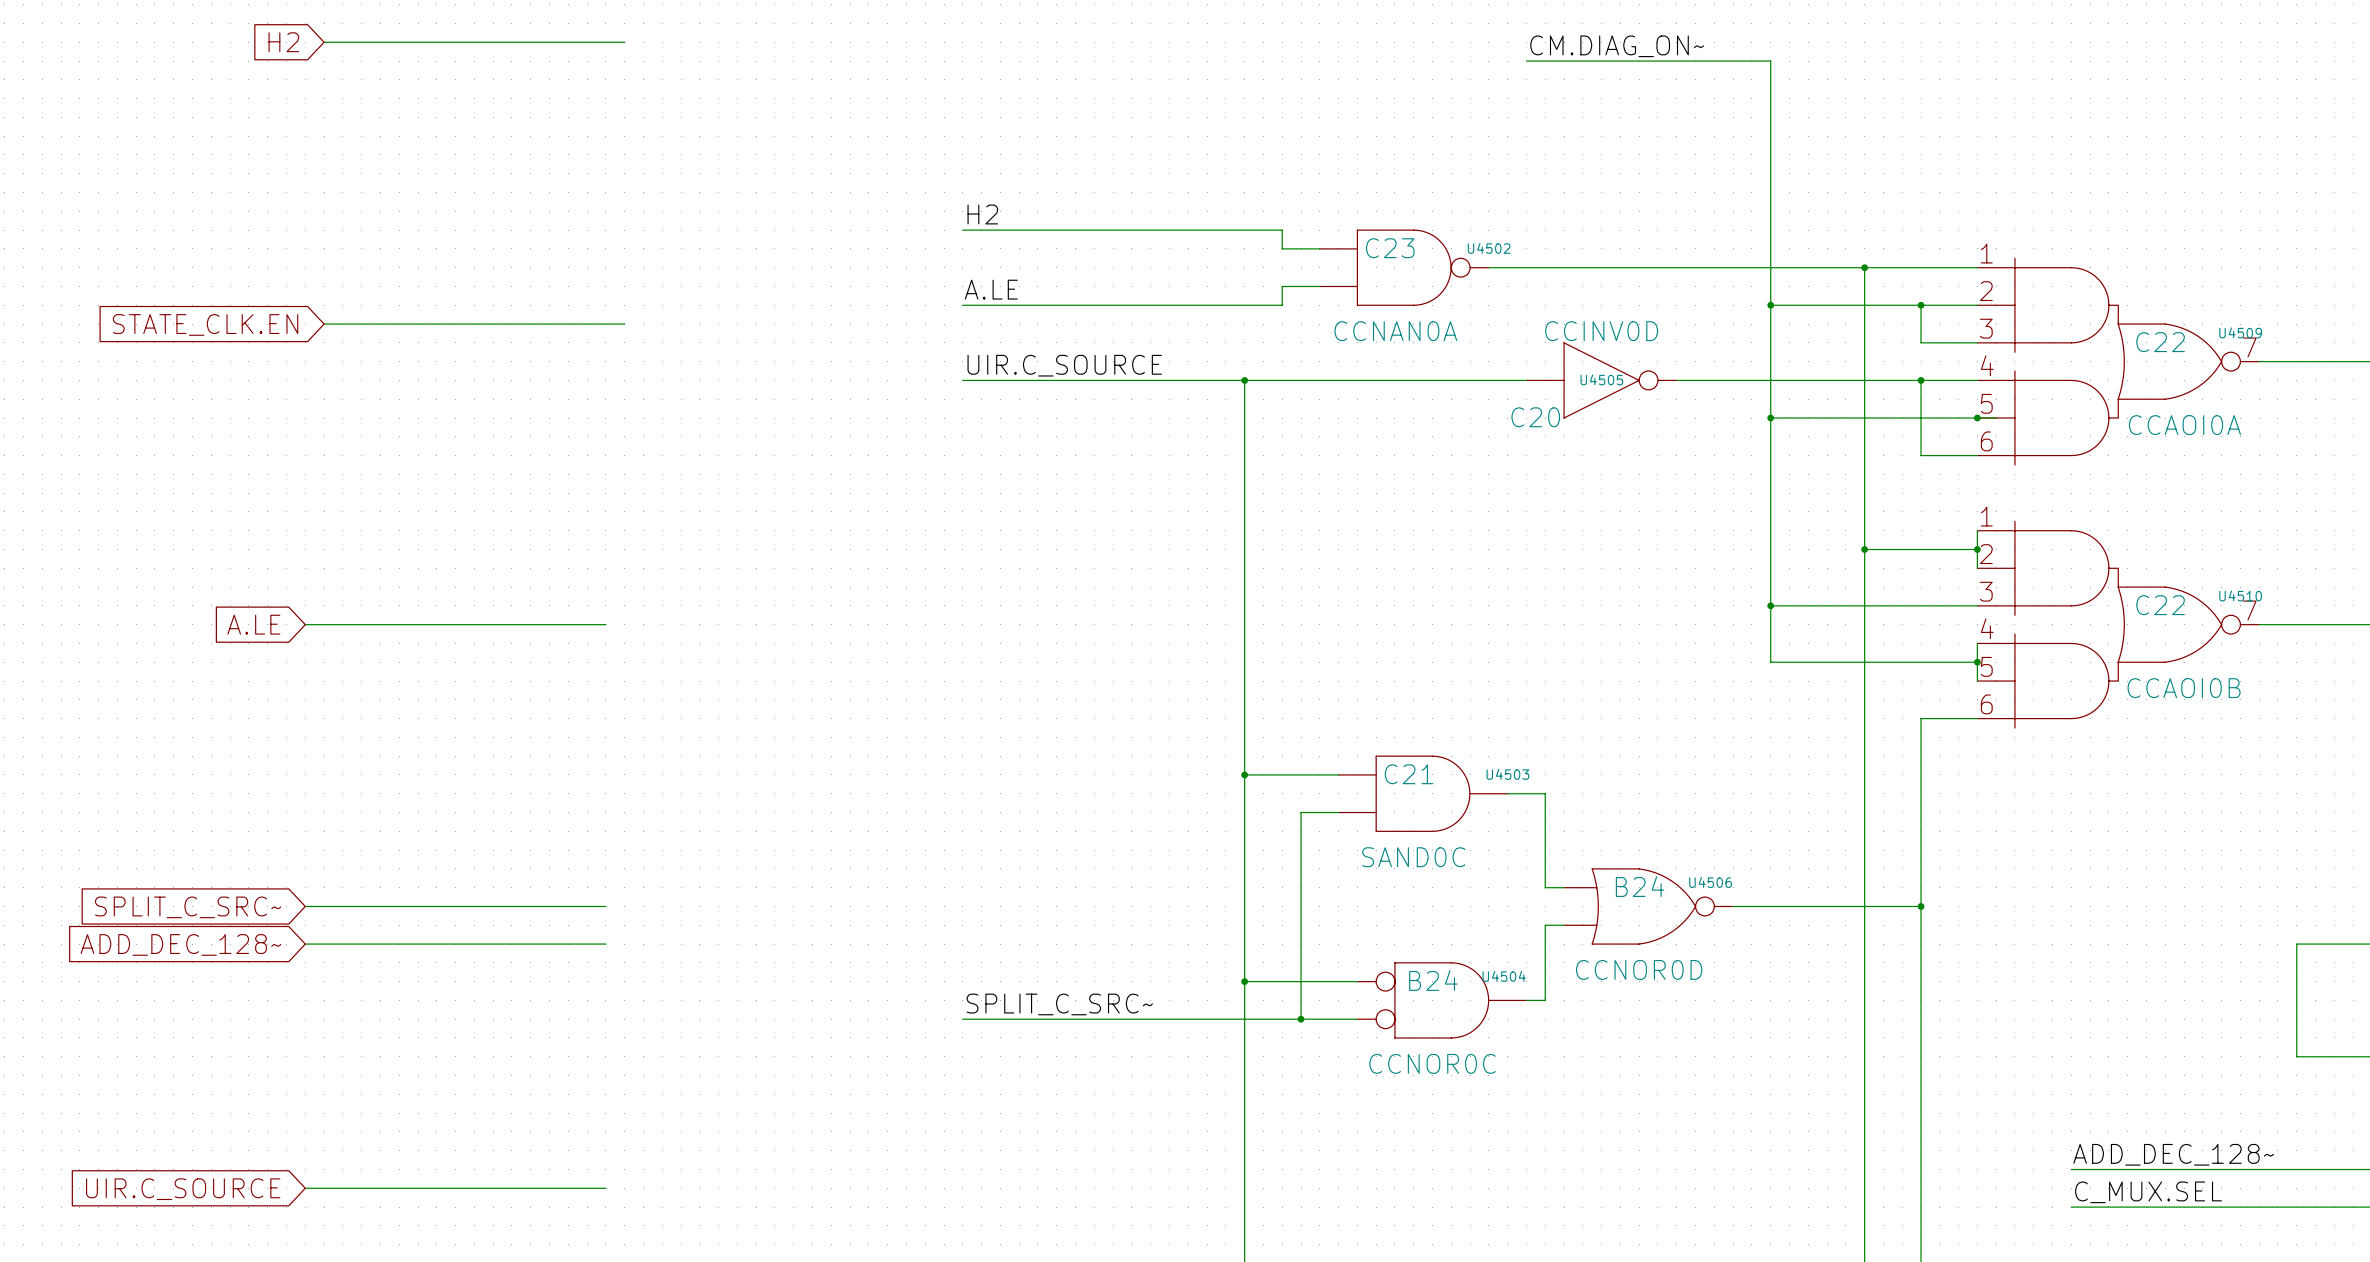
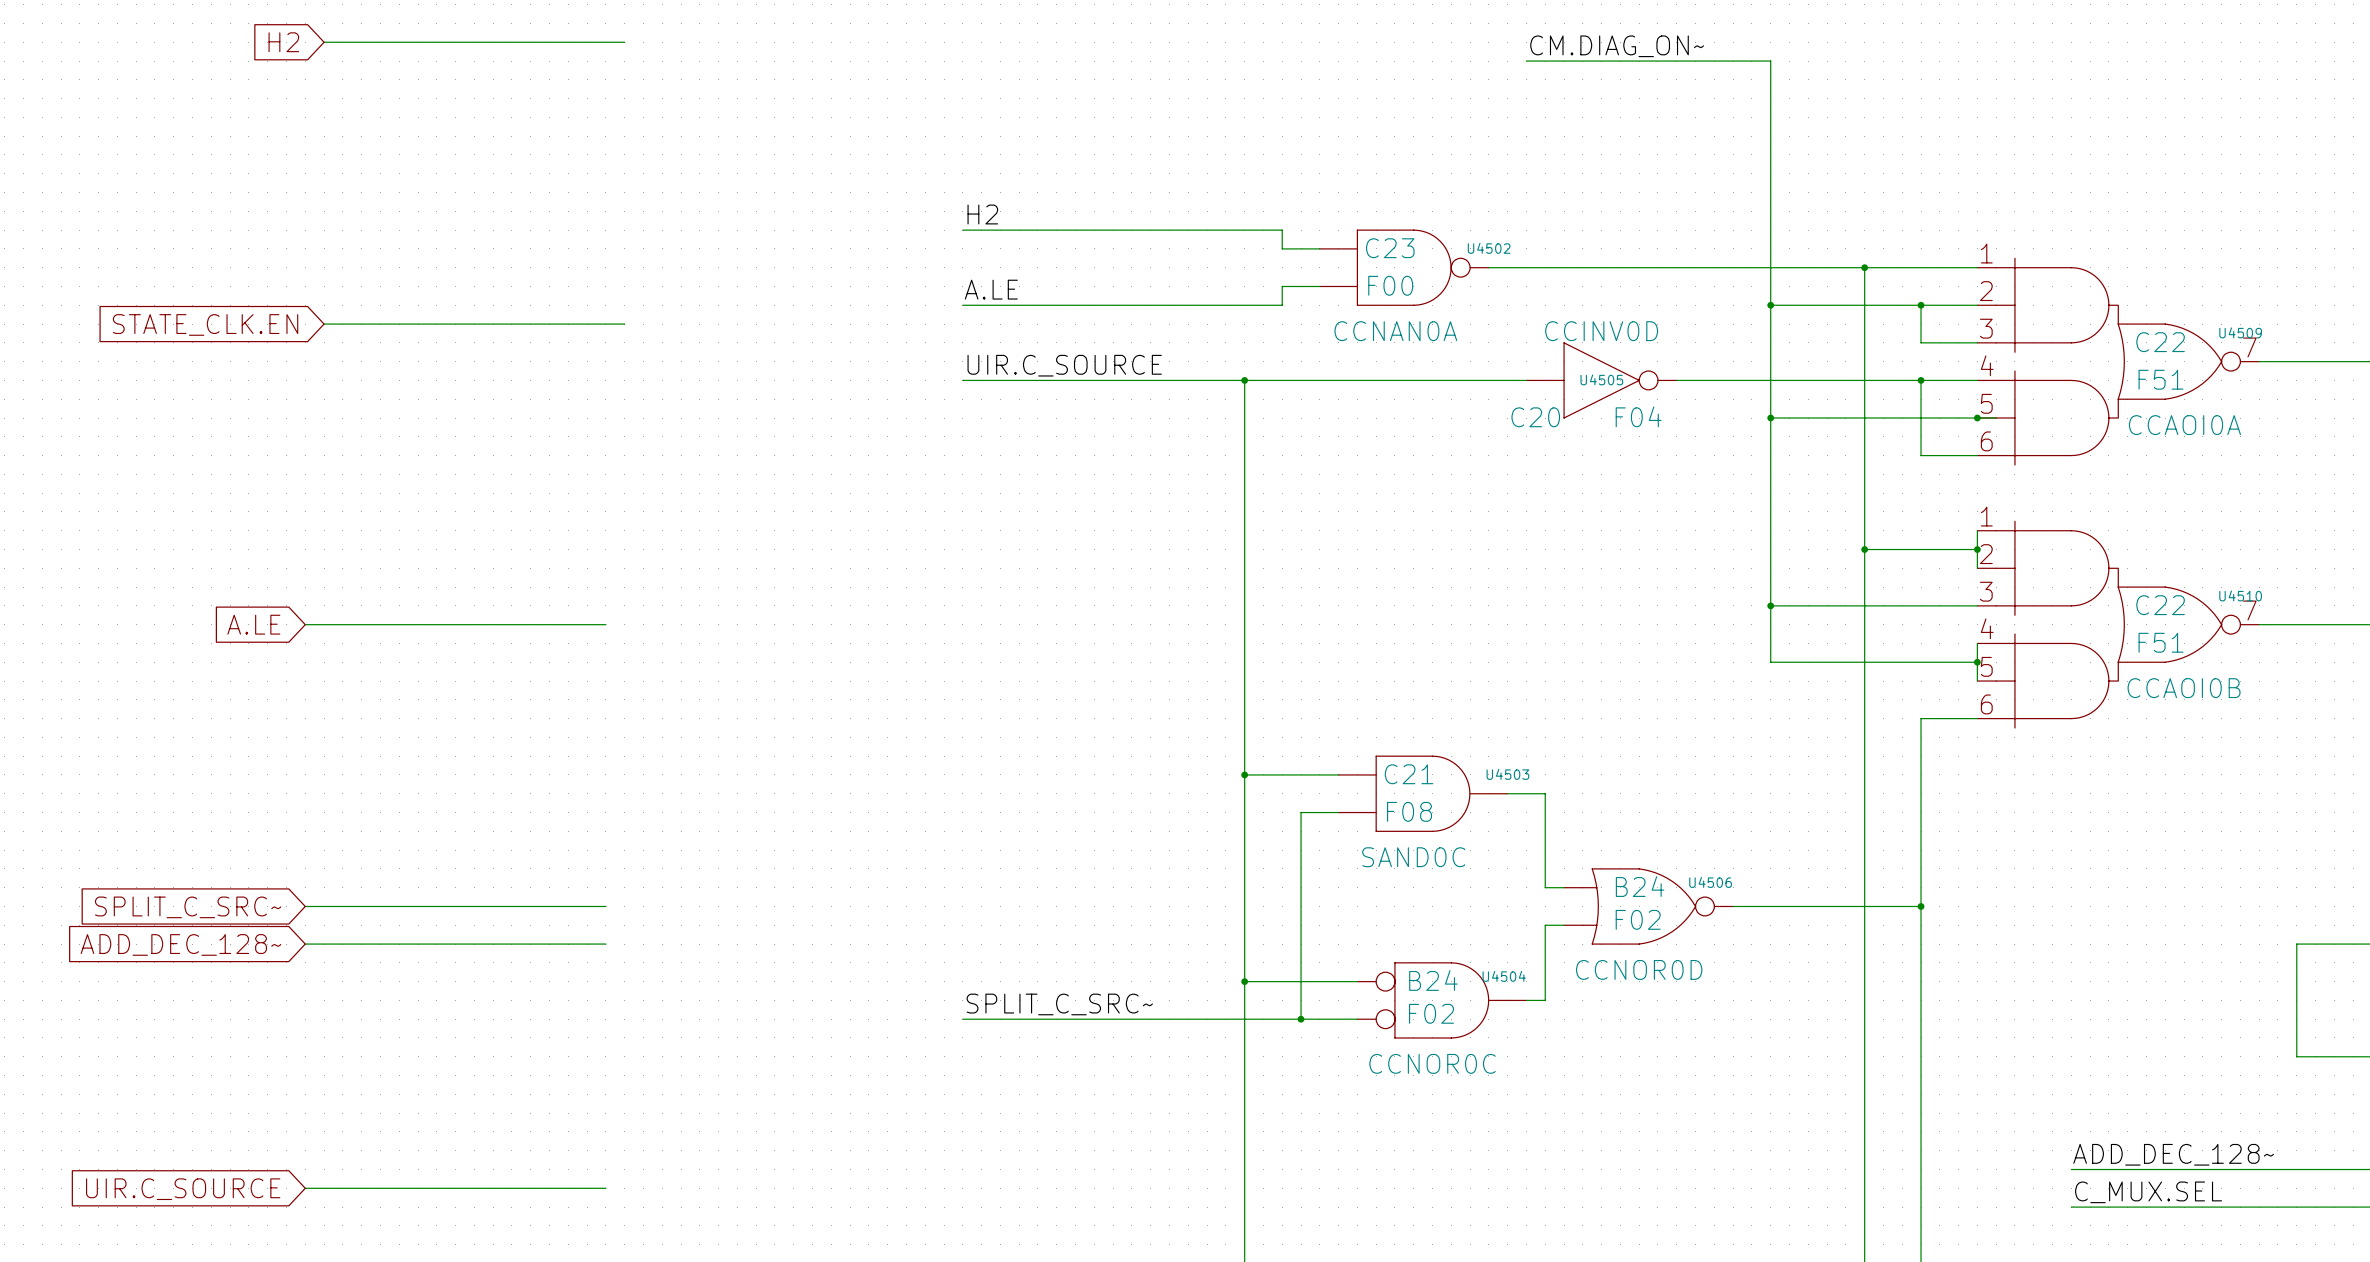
U4502 value: none -> F00 (1390, 285)
U4509 value: none -> F51 (2161, 379)
U4505 value: none -> F04 (1638, 416)
U4510 value: none -> F51 (2161, 642)
U4503 value: none -> F08 (1409, 811)
U4506 value: none -> F02 (1638, 919)
U4504 value: none -> F02 (1431, 1013)

